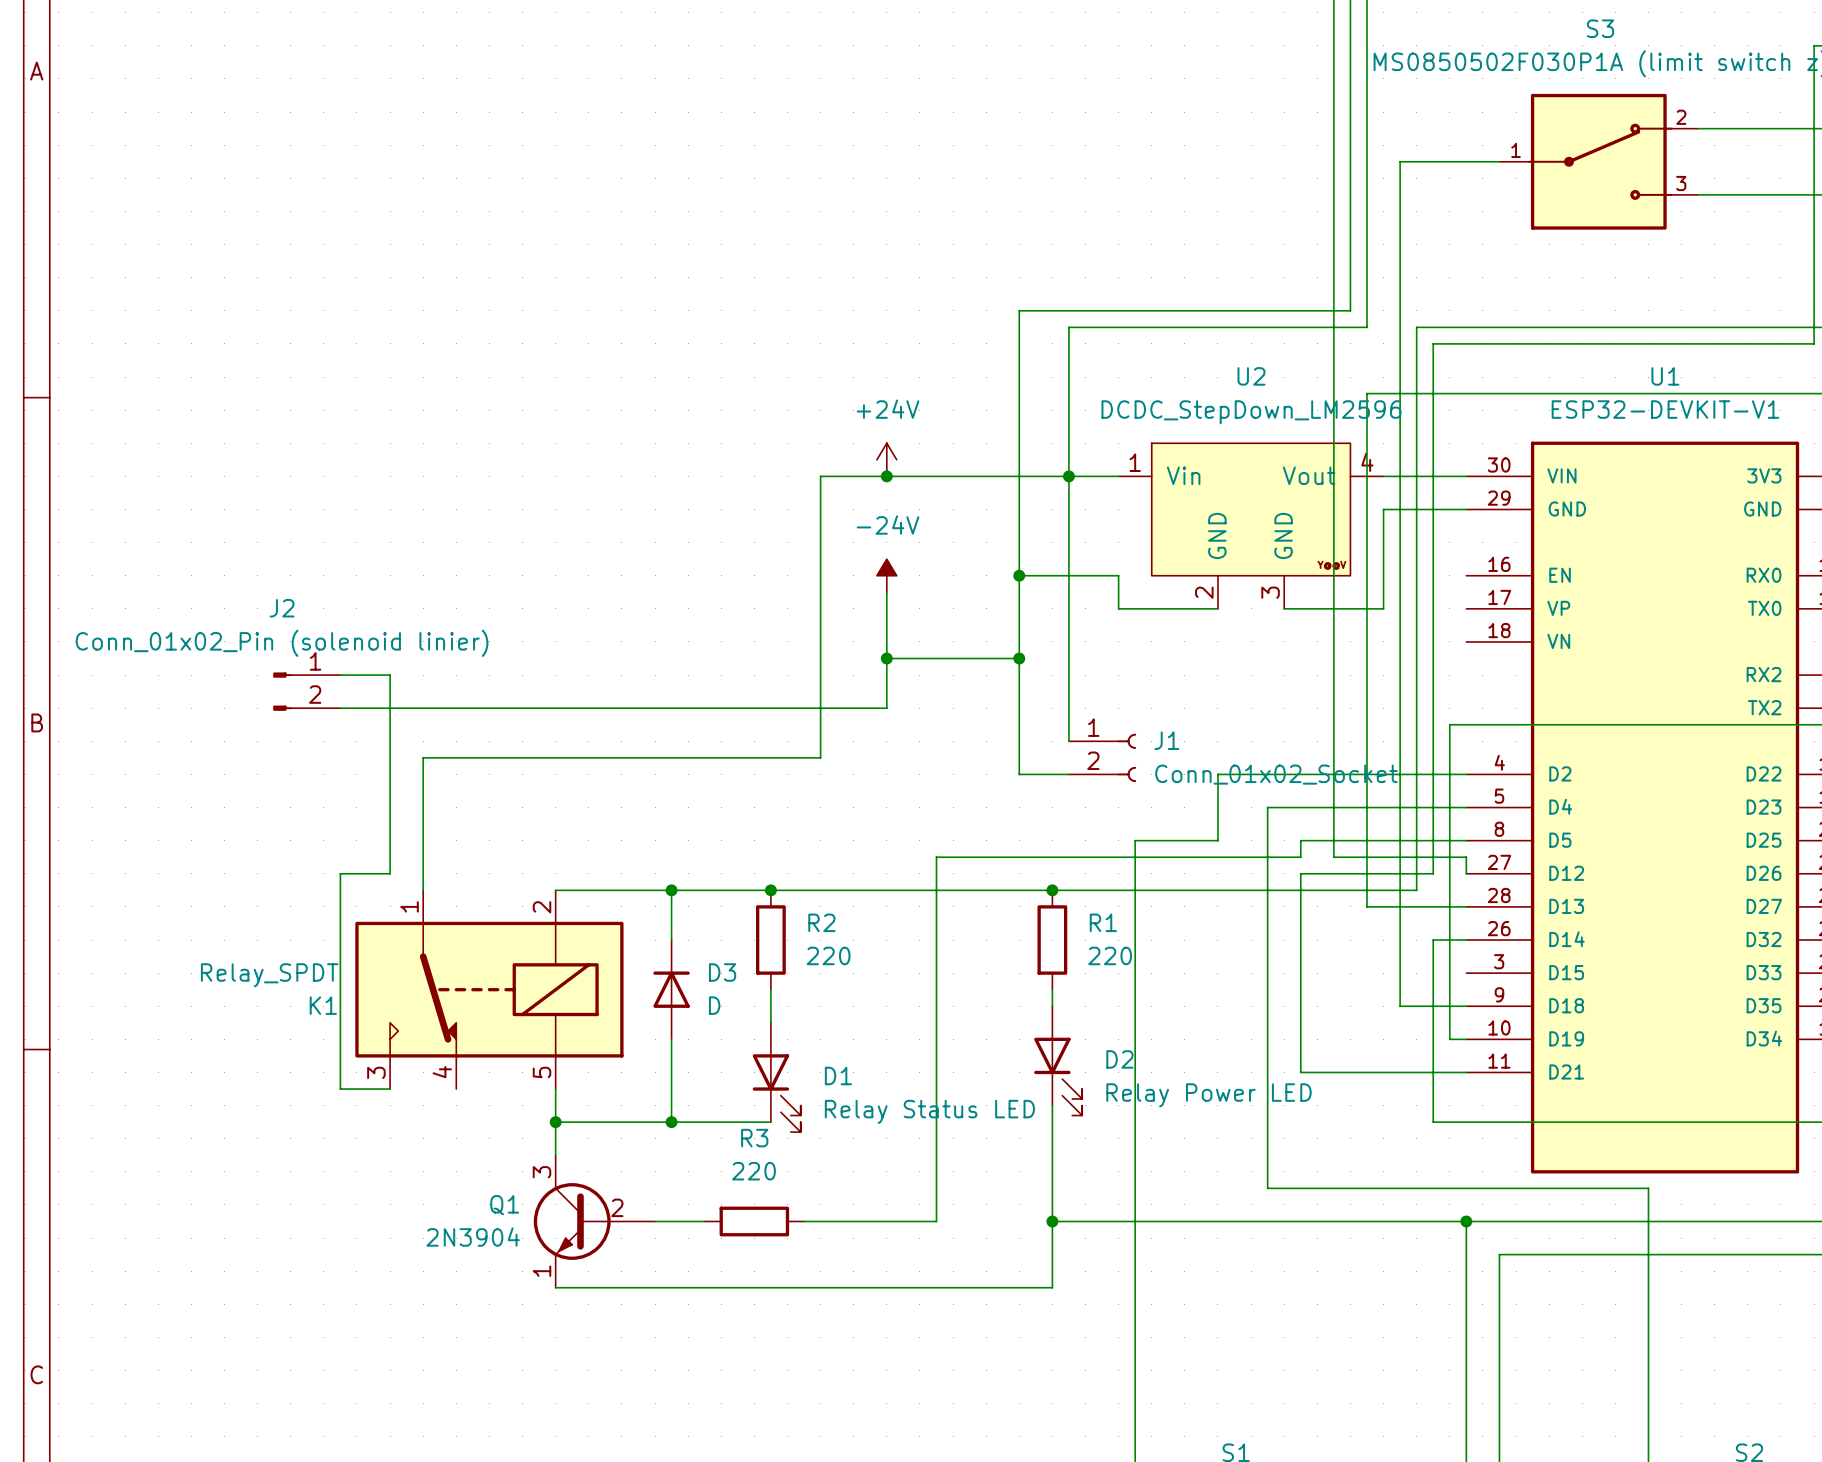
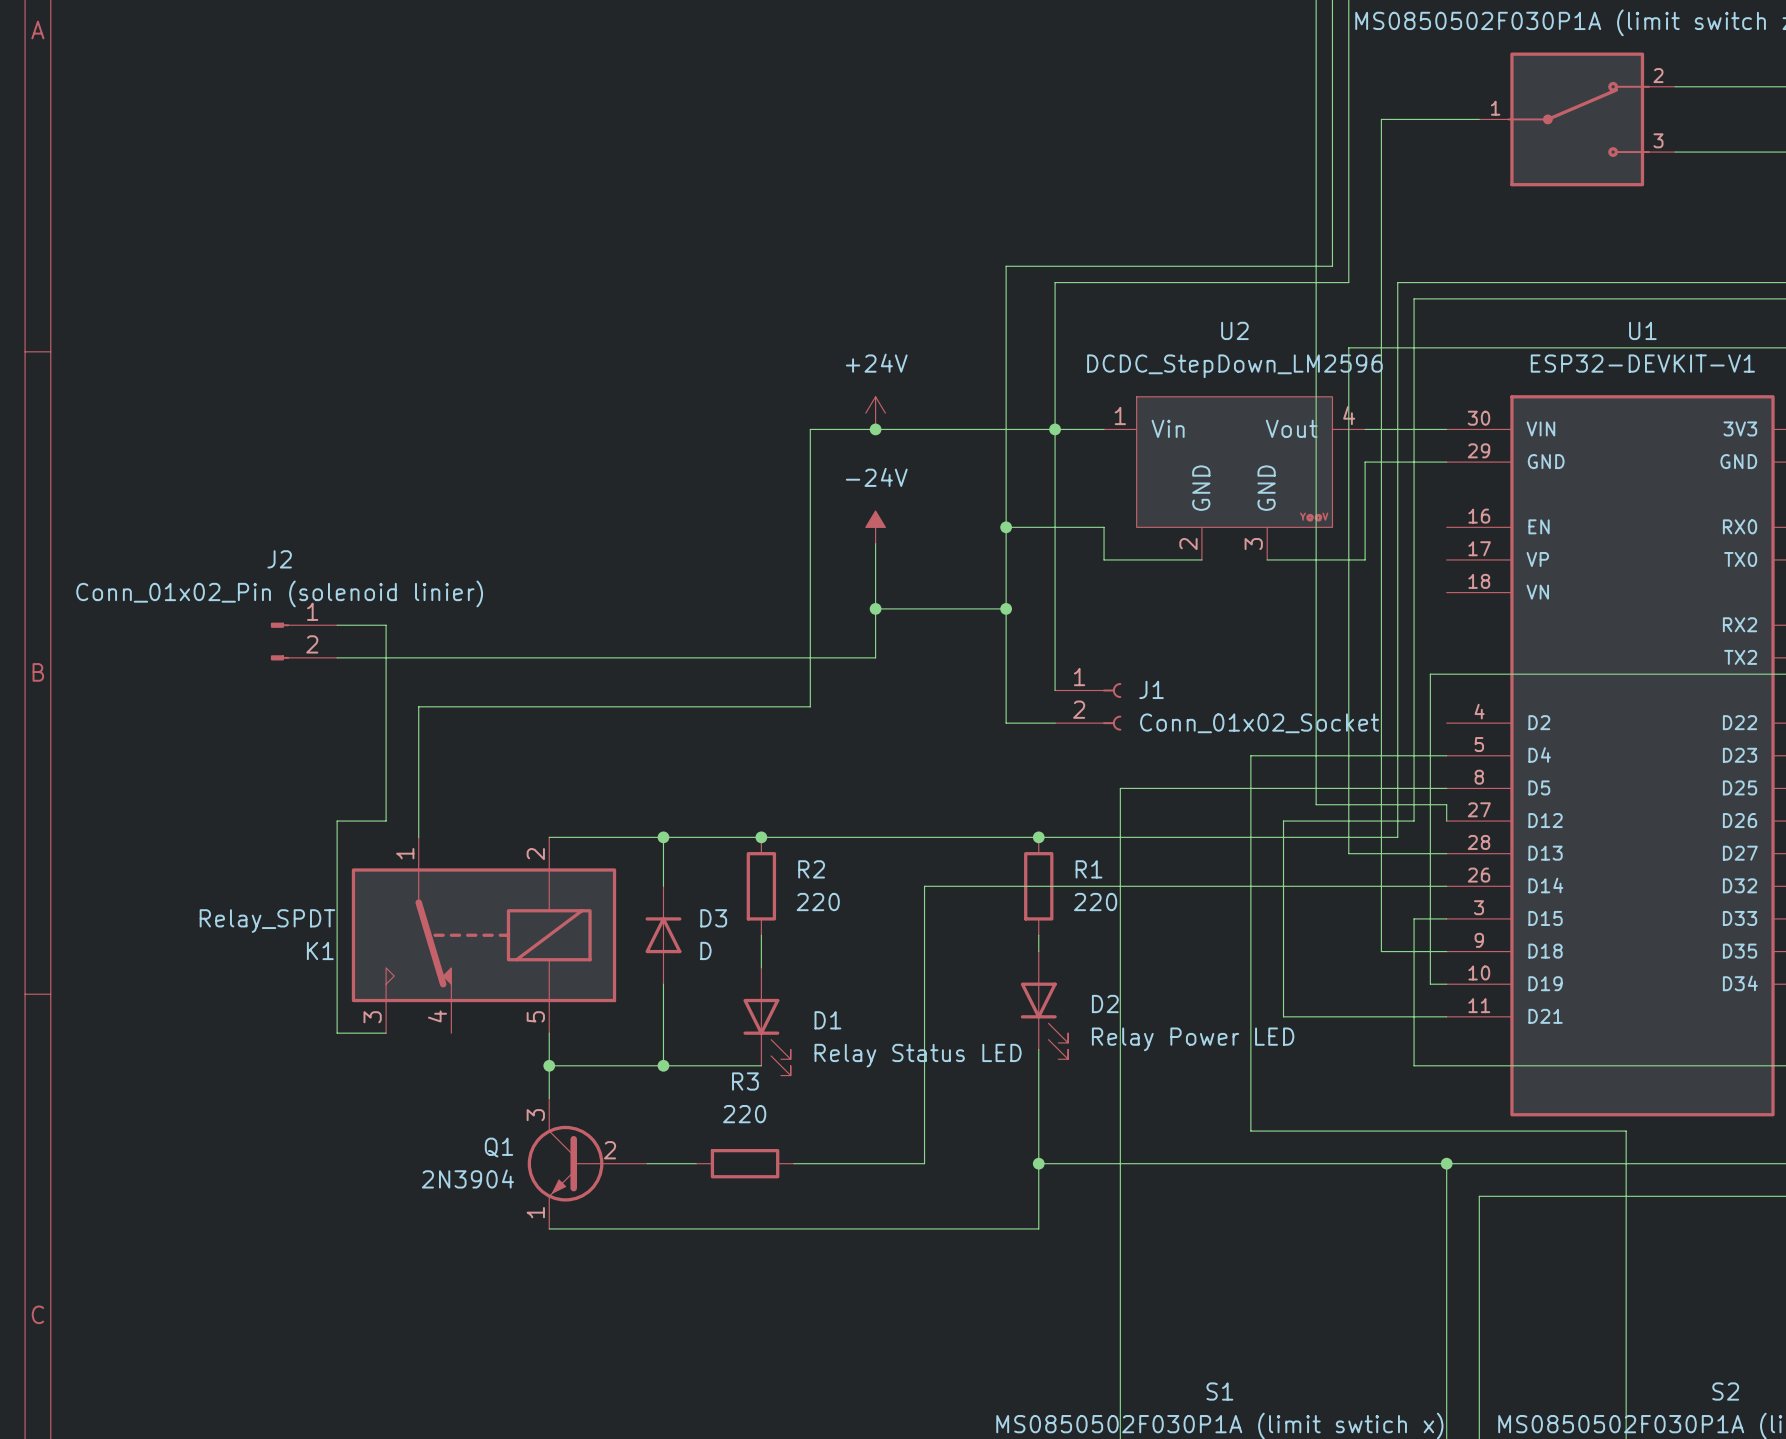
wire: (1466, 774) (1217, 774) (1217, 840) -> (1283, 788) (1201, 788)
wire: (1300, 840) (1300, 857) (936, 857) (936, 940) -> (1414, 886) (924, 886)
wire: (1433, 940) (1433, 973) -> (1446, 918) (1414, 918)

